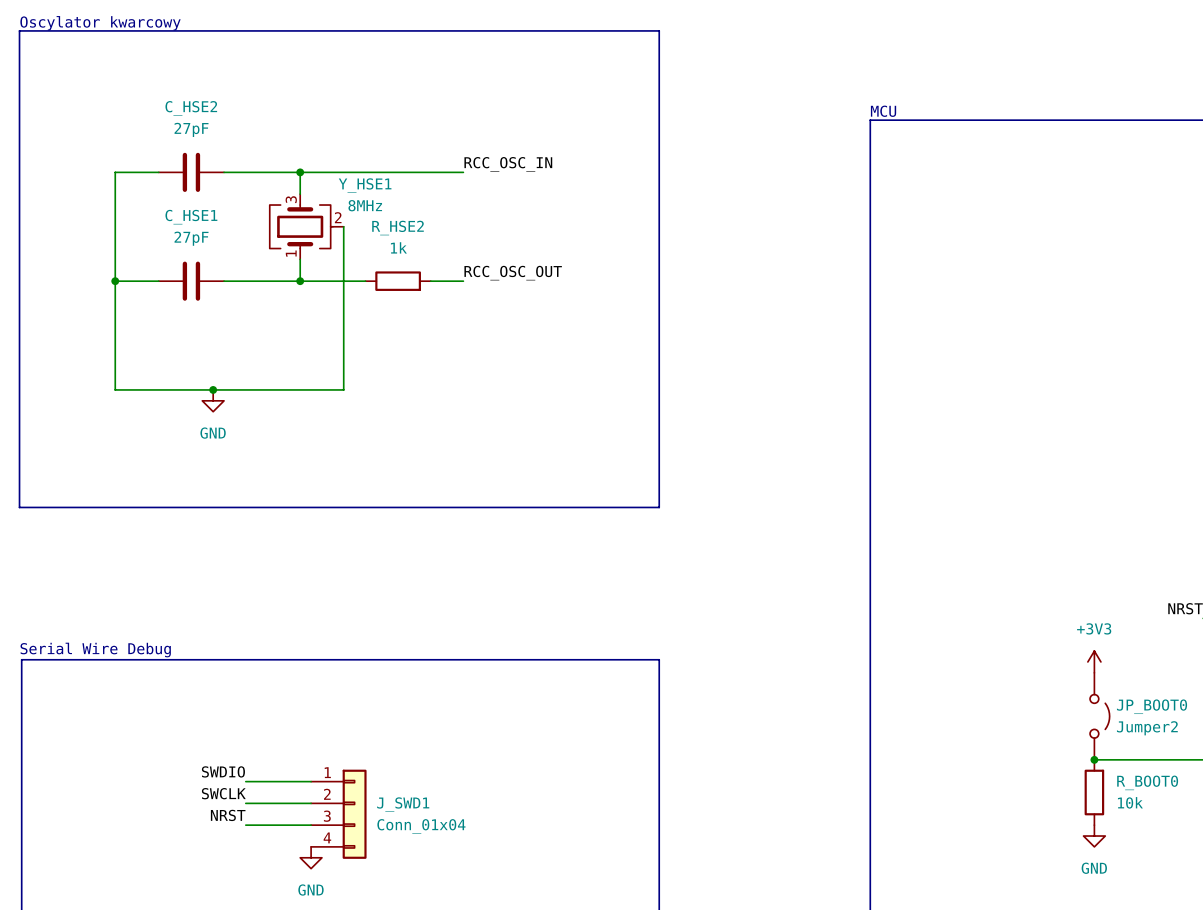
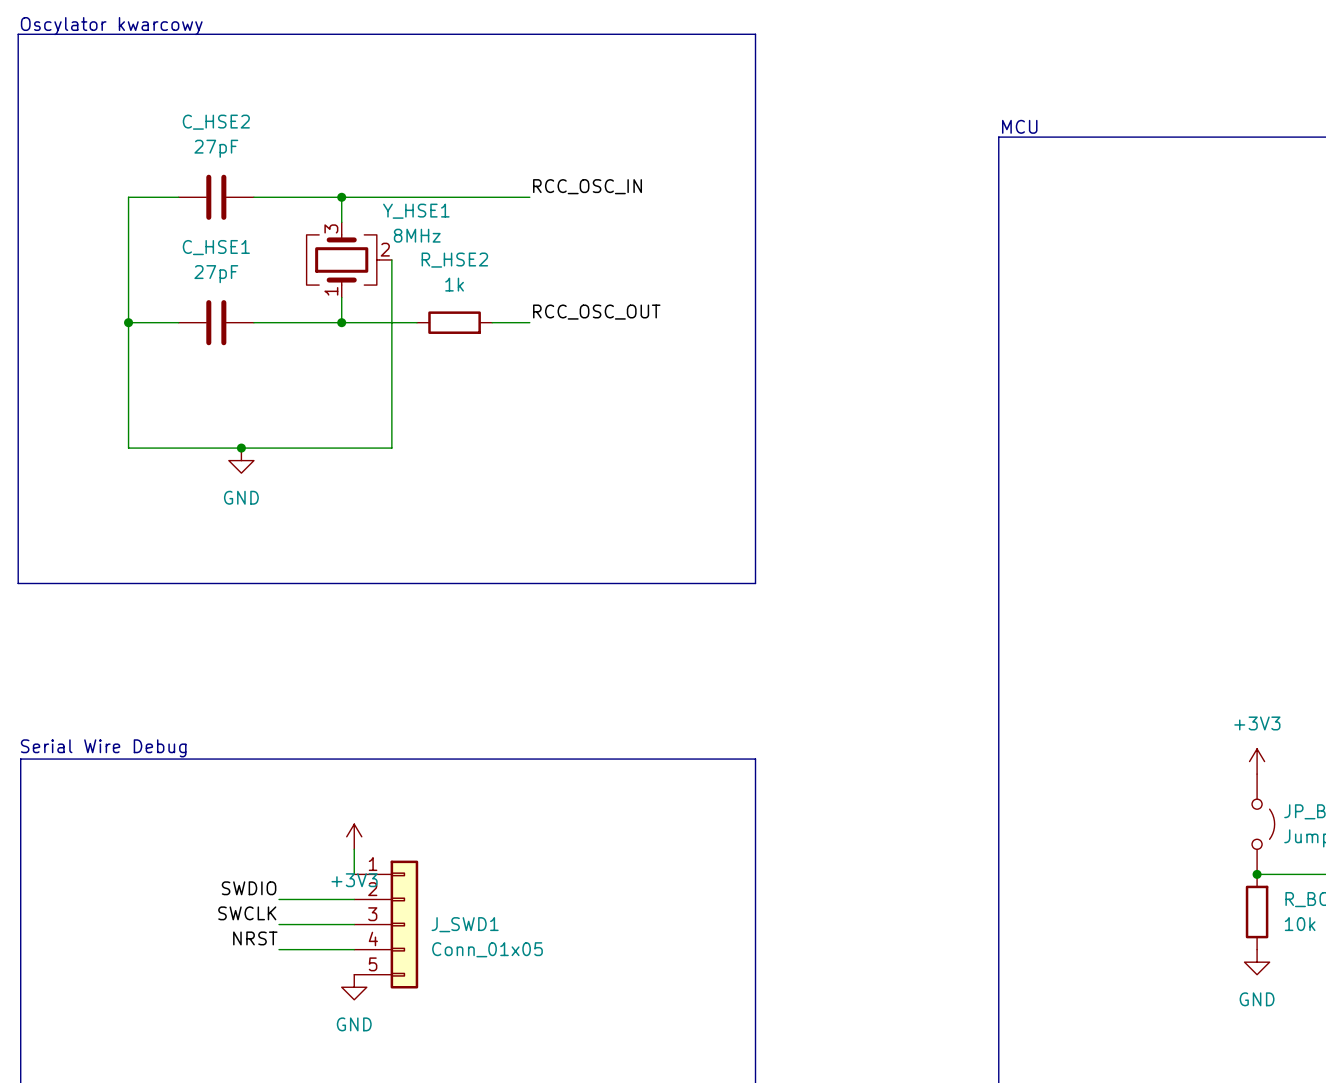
power symbol: none -> +3V3 (354, 836)
wire: none -> (354, 849) (354, 874)
J_SWD1 symbol: [311, 769, 367, 859] -> [354, 860, 419, 989]
J_SWD1 value: Conn_01x04 (421, 826) -> Conn_01x05 (487, 949)

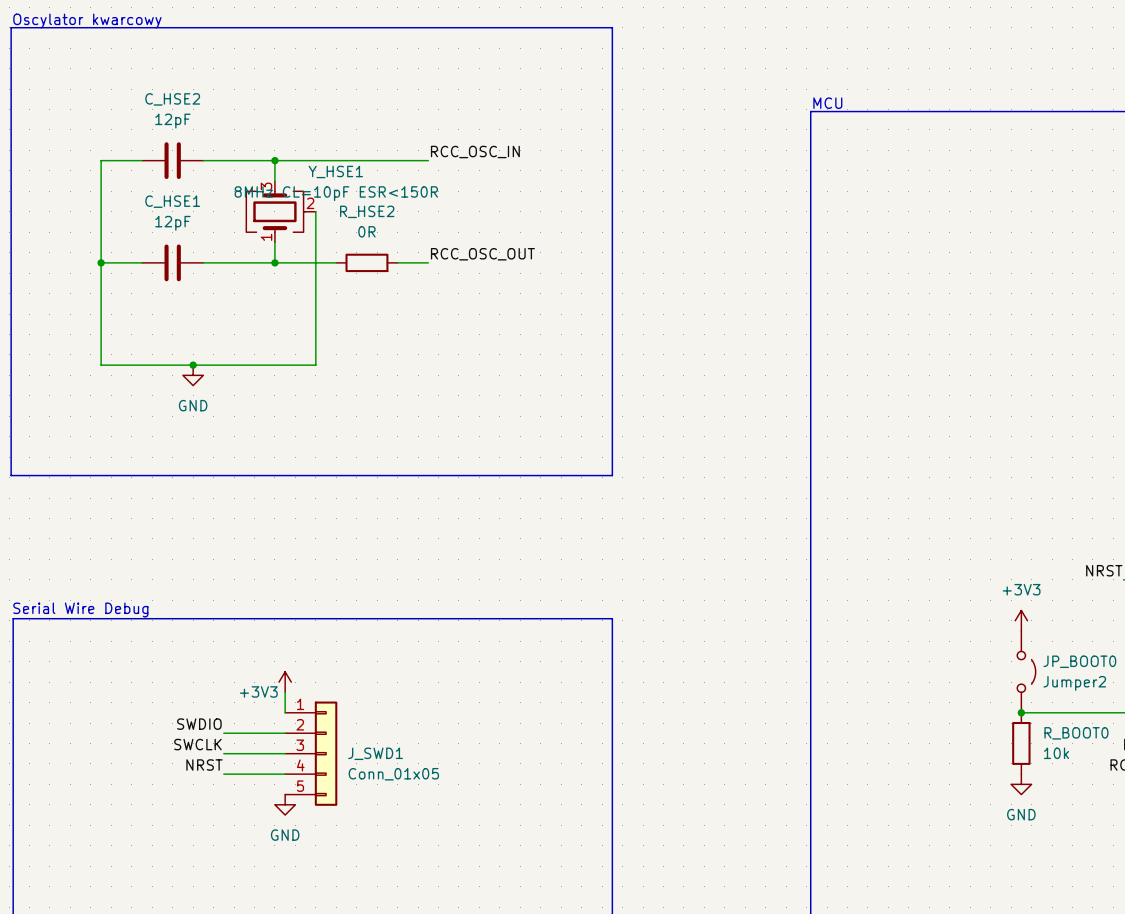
C_HSE2 value: 27pF (216, 148) -> 12pF (172, 121)
Y_HSE1 value: 8MHz (417, 235) -> 8MHz CL=10pF ESR<150R (336, 193)
C_HSE1 value: 27pF (216, 274) -> 12pF (172, 223)
R_HSE2 value: 1k (454, 284) -> 0R (366, 231)
power symbol text position: +3V3 (354, 880) -> +3V3 (258, 691)

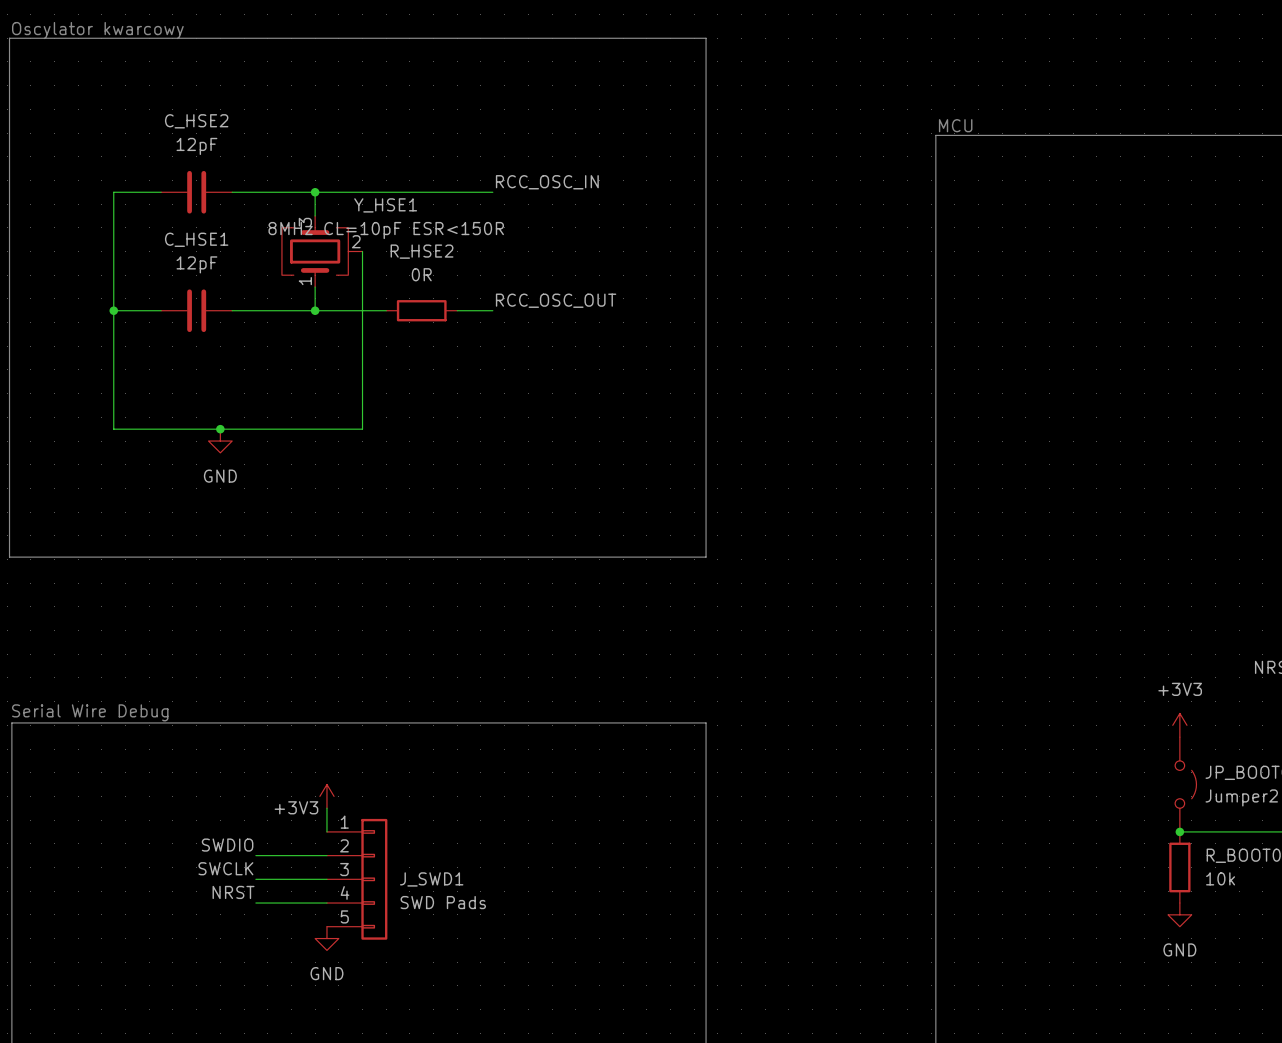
J_SWD1 value: Conn_01x05 (393, 774) -> SWD Pads (443, 902)

